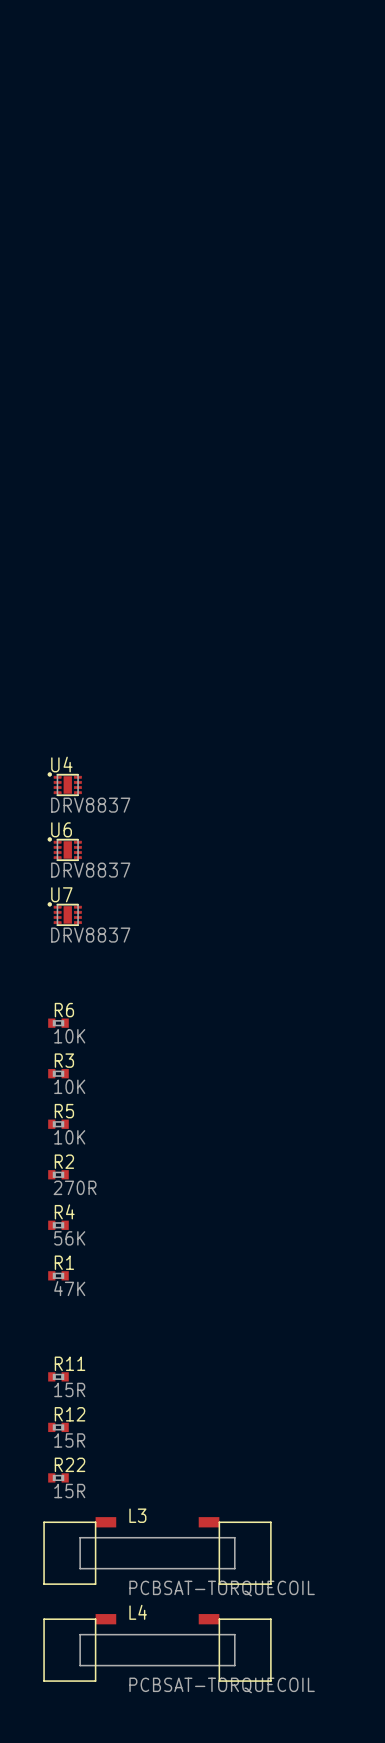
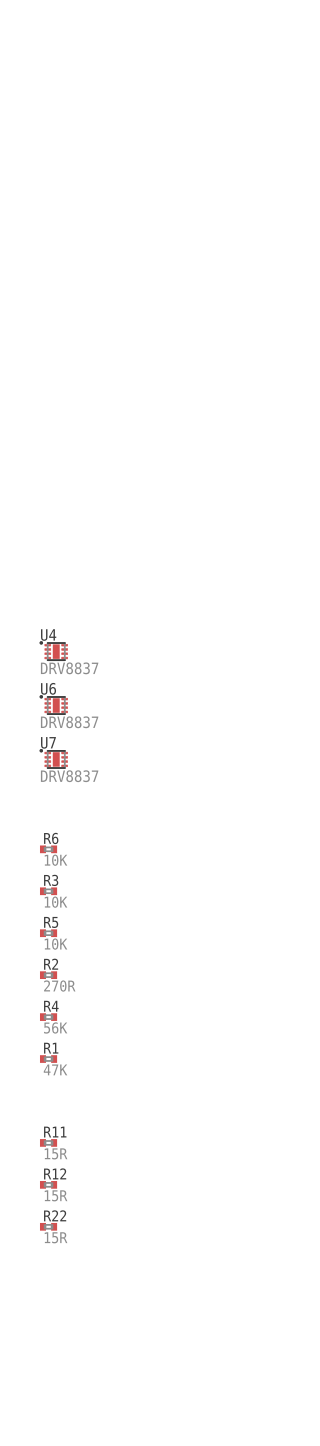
L3: PCBSAT-TORQUECOIL (157, 1550) -> none
L4: PCBSAT-TORQUECOIL (157, 1647) -> none

